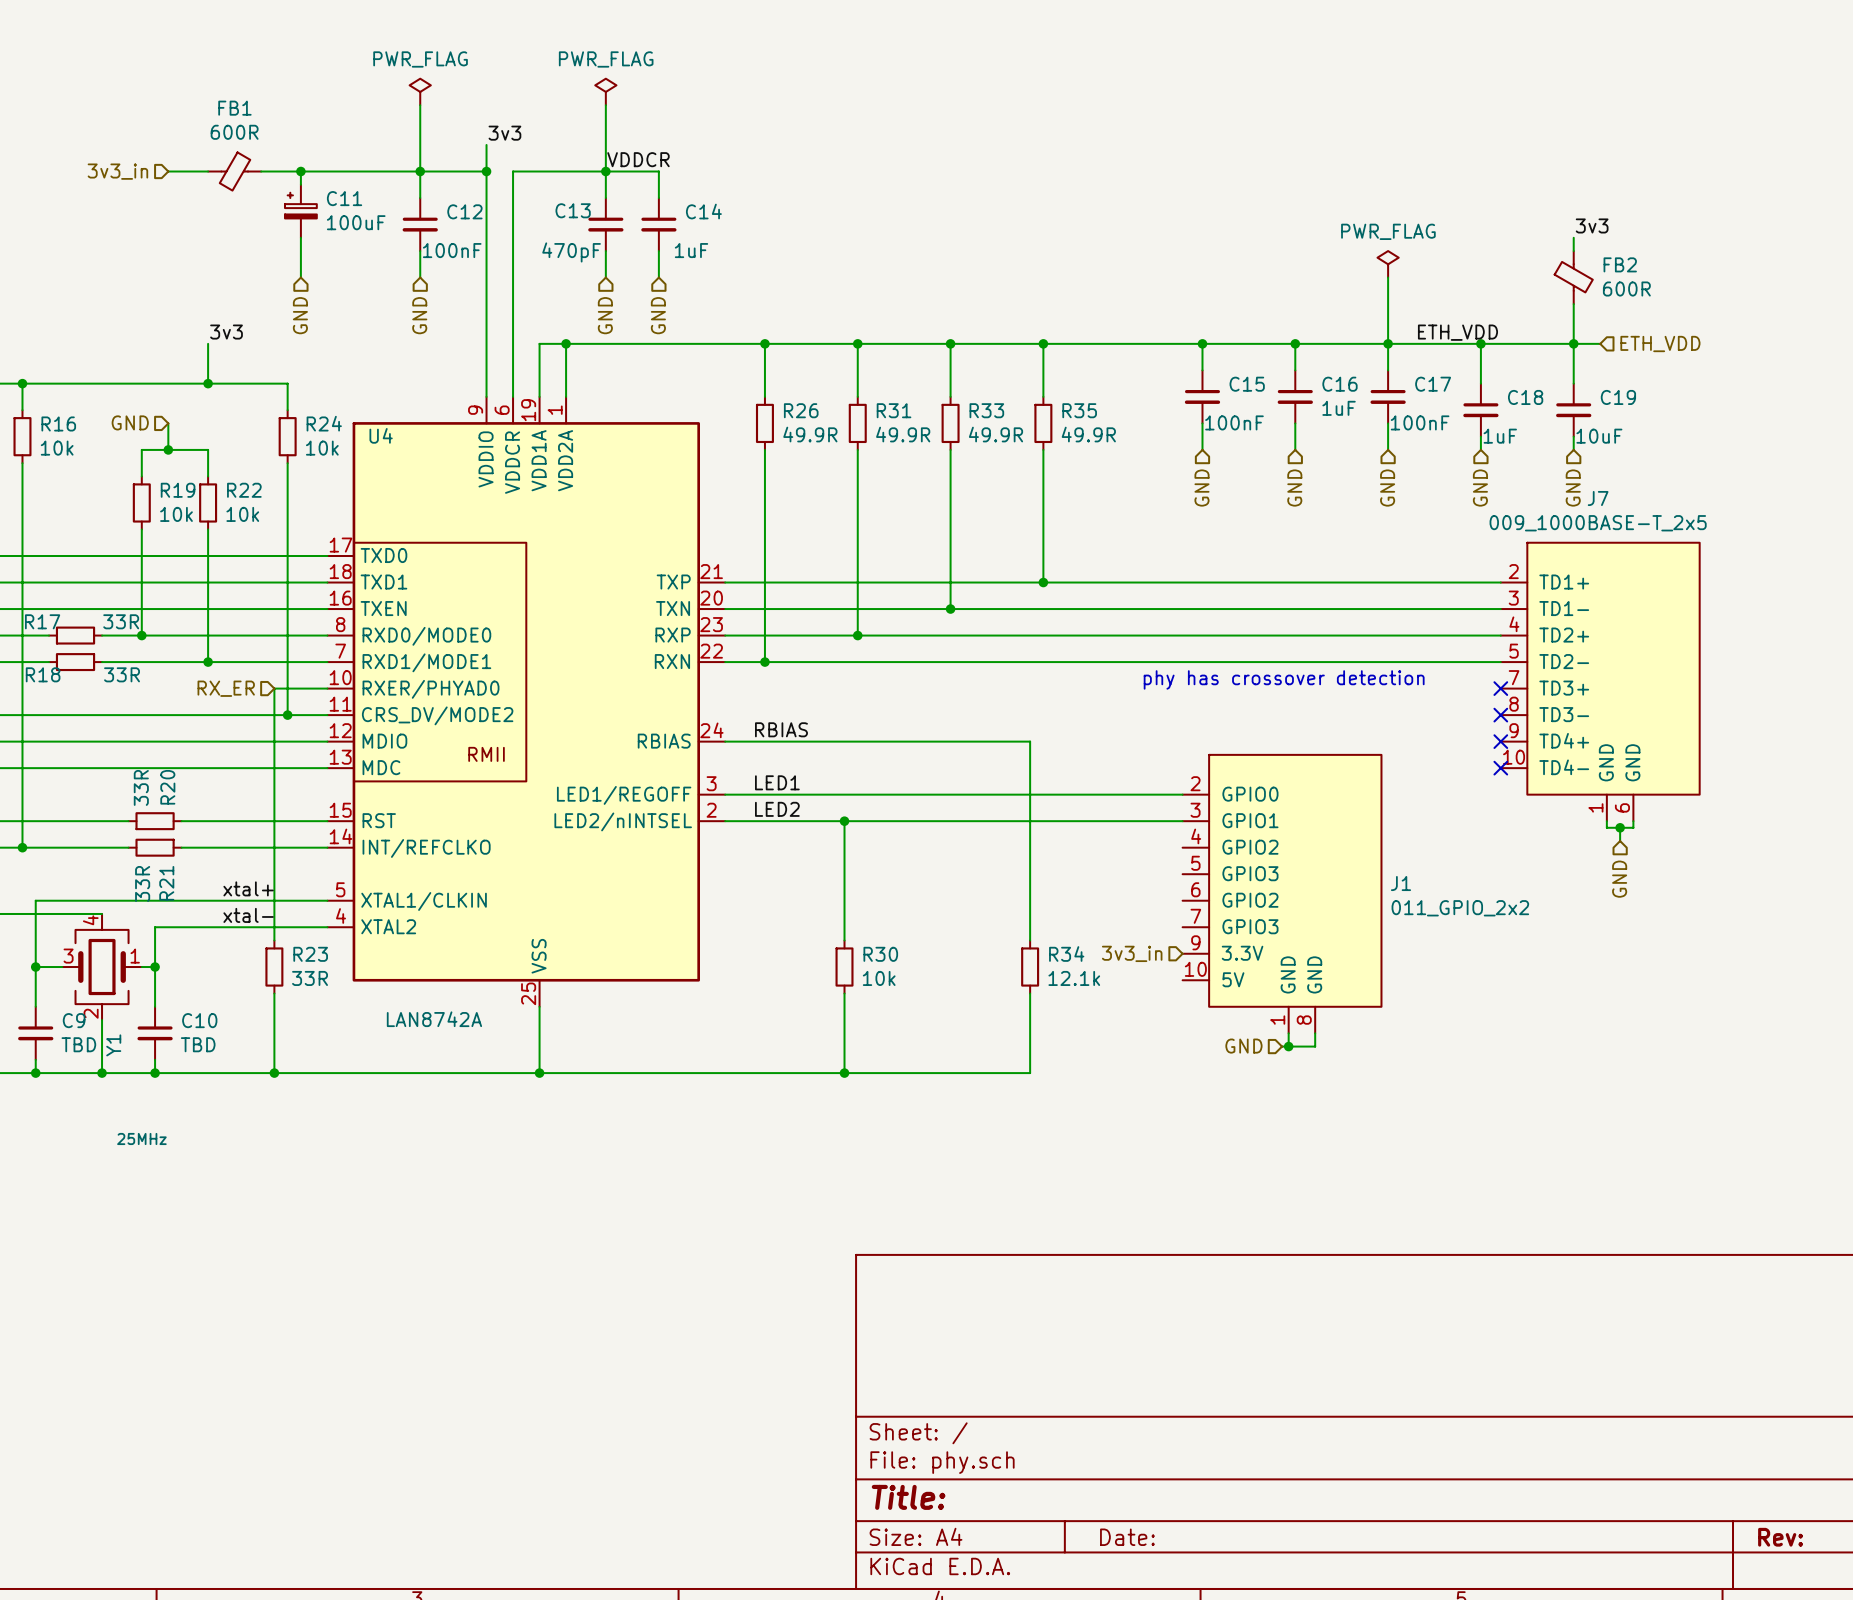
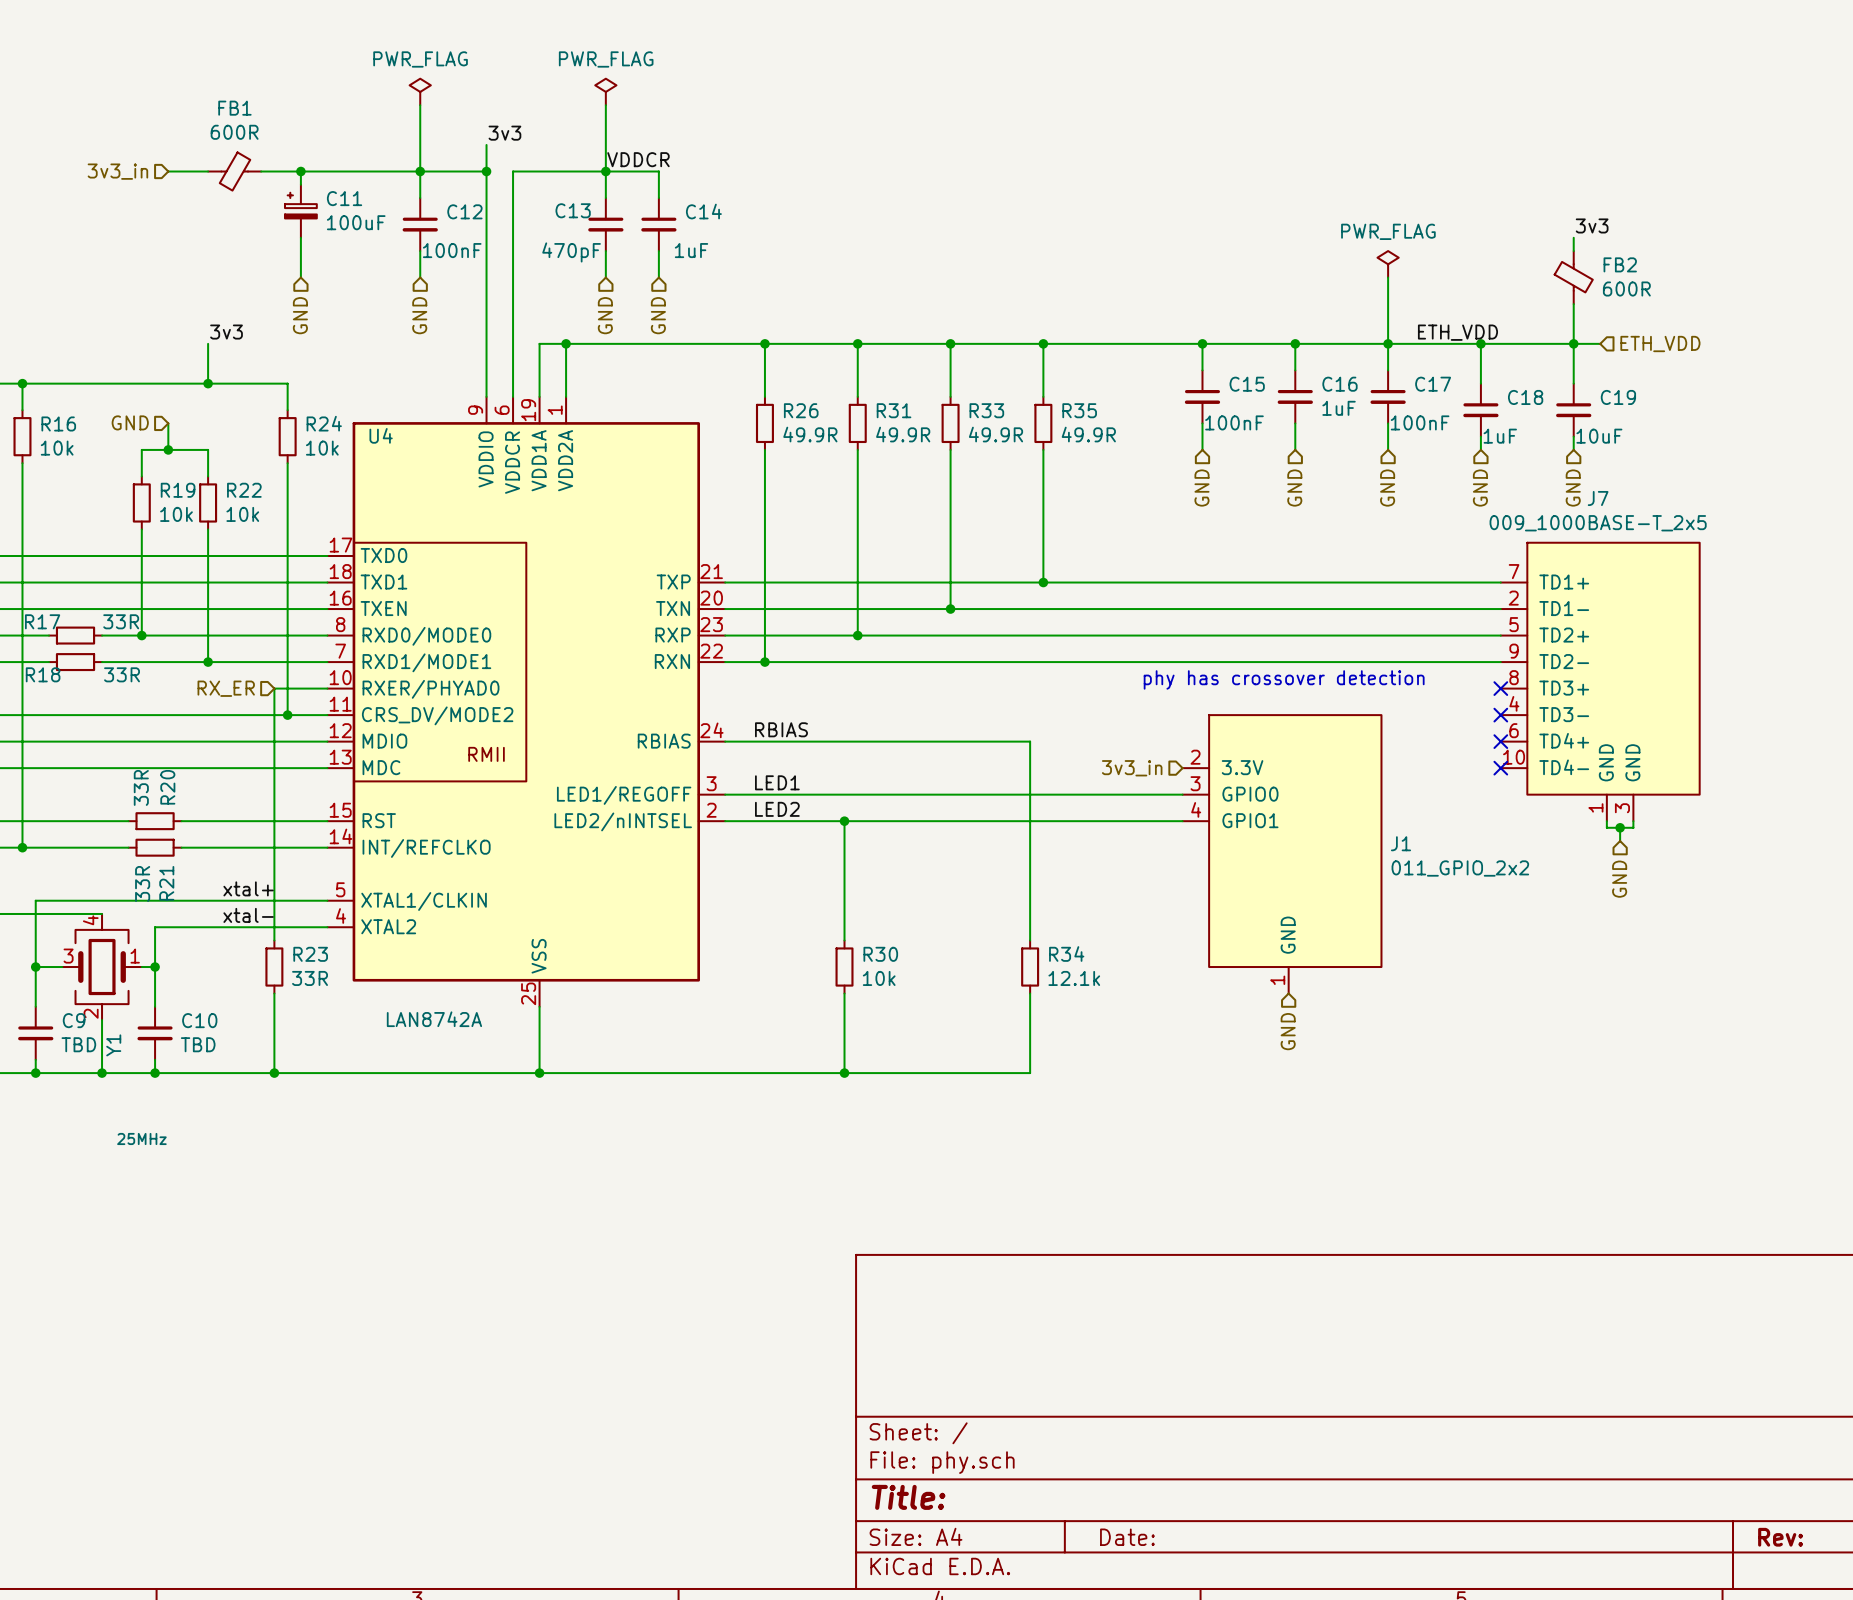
J7 pin number: 2 (1513, 571) -> 7 (1514, 571)
J7 pin number: 3 (1513, 598) -> 2 (1513, 598)
J7 pin number: 4 (1514, 624) -> 5 (1514, 624)
J7 pin number: 5 (1514, 651) -> 9 (1514, 651)
J7 pin number: 7 (1514, 677) -> 8 (1514, 677)
J7 pin number: 8 (1514, 704) -> 4 (1514, 703)
J7 pin number: 9 (1514, 730) -> 6 (1514, 730)
J1 symbol: [1182, 754, 1382, 1034] -> [1182, 715, 1382, 994]
J7 pin number: 6 (1622, 807) -> 3 (1622, 808)
hierarchical label position: 3v3_in (1132, 953) -> 3v3_in (1132, 768)
wire: (1288, 1033) (1288, 1046) -> none
wire: (1315, 1033) (1315, 1046) (1282, 1046) -> none
hierarchical label rotation: 0° (1243, 1046) -> 90° counterclockwise (1288, 1031)
junction: (1288, 1046) -> none

